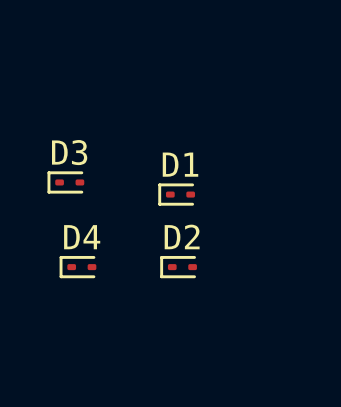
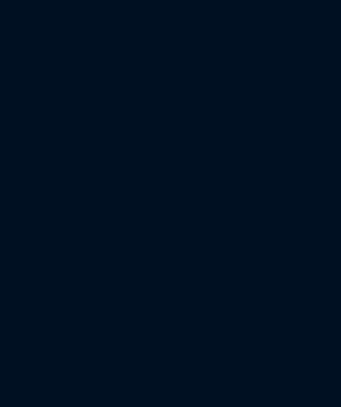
D3: (65, 182) -> none
D1: (176, 194) -> none
D4: (77, 267) -> none
D2: (178, 267) -> none

